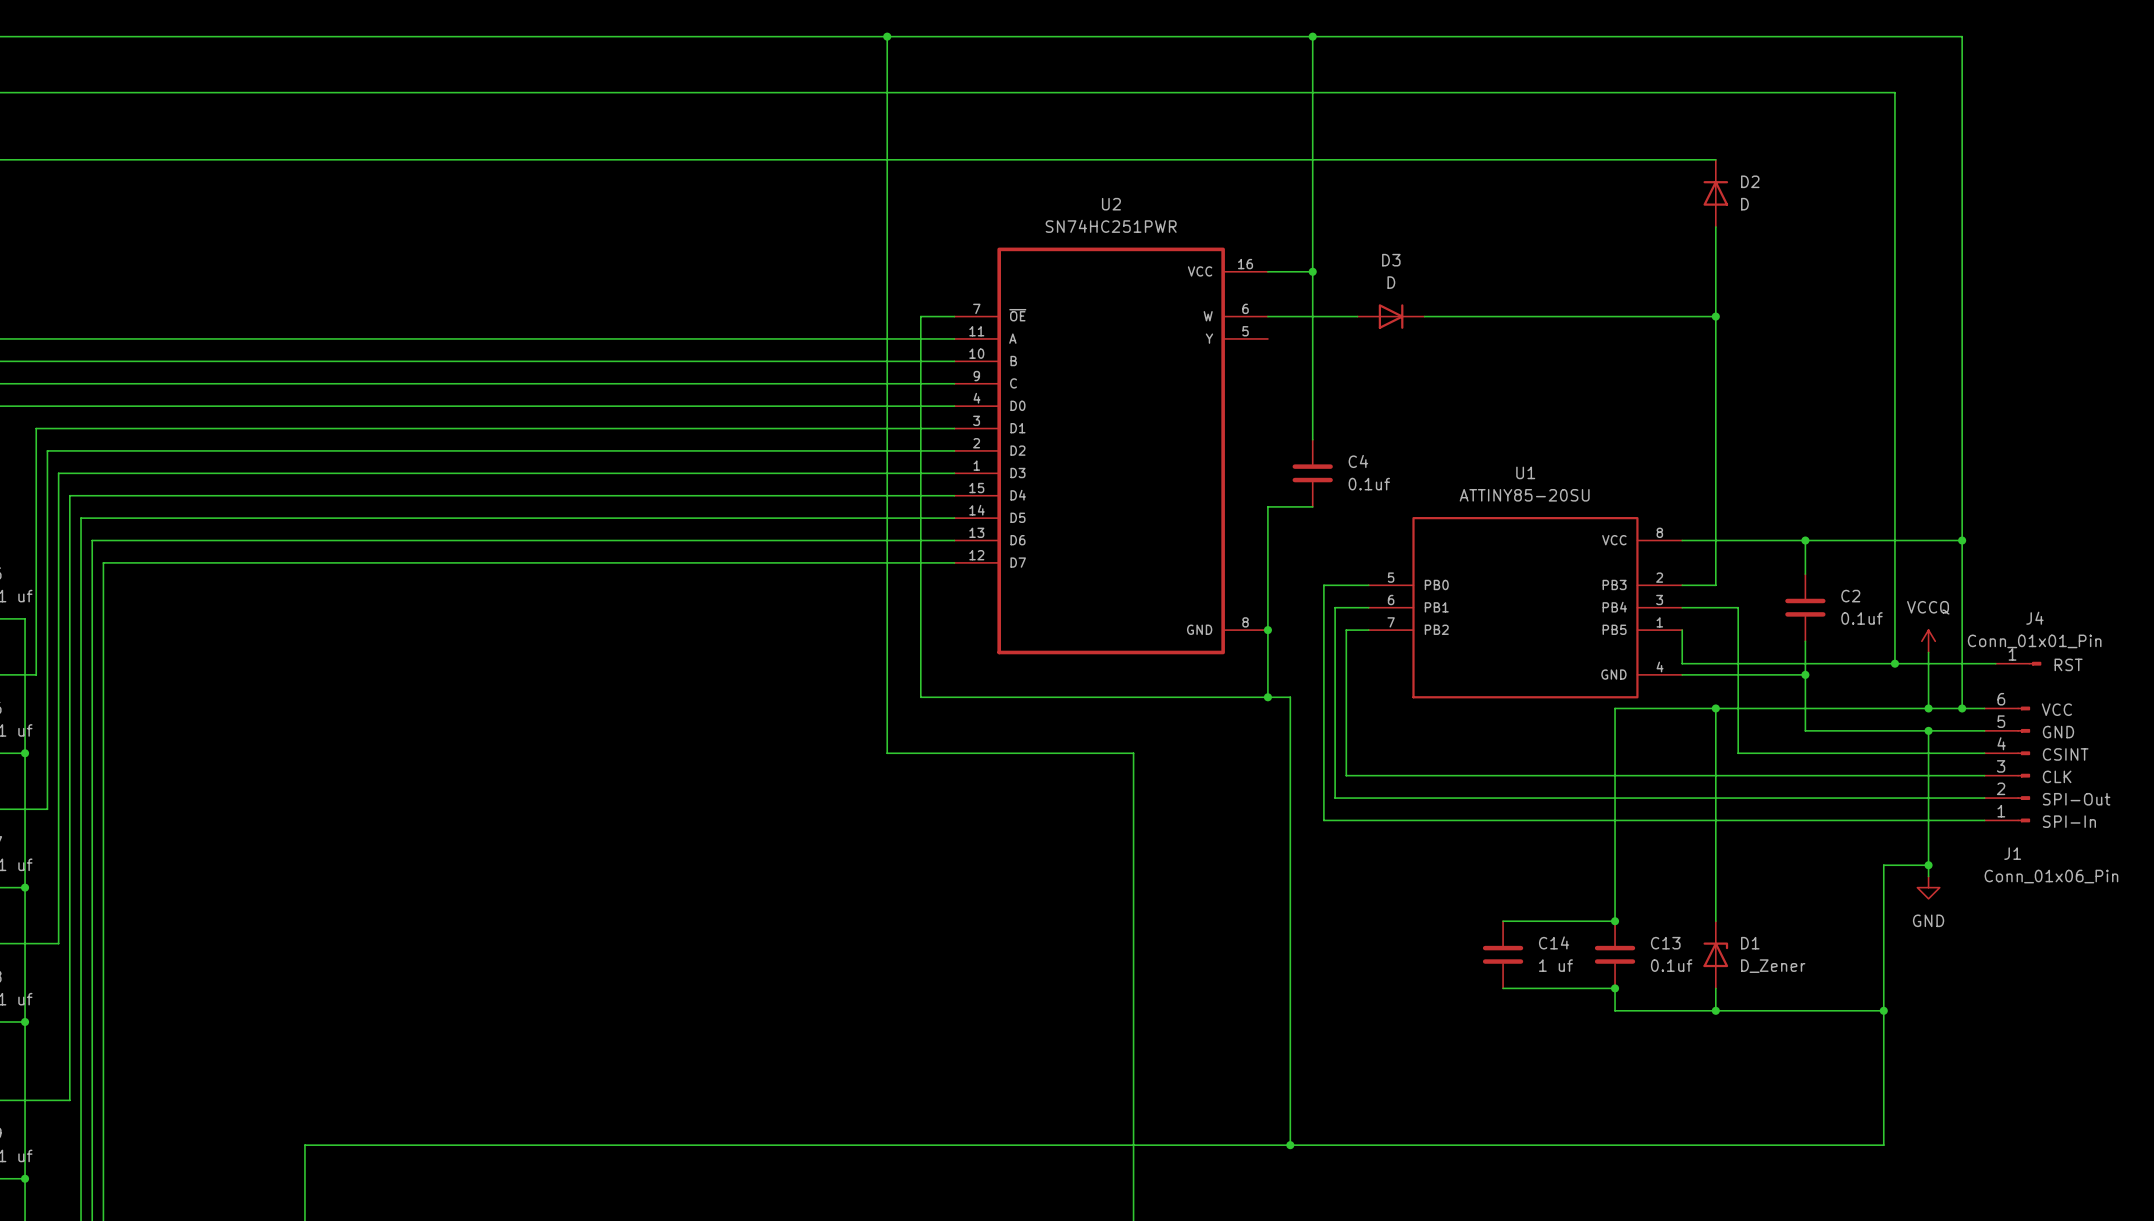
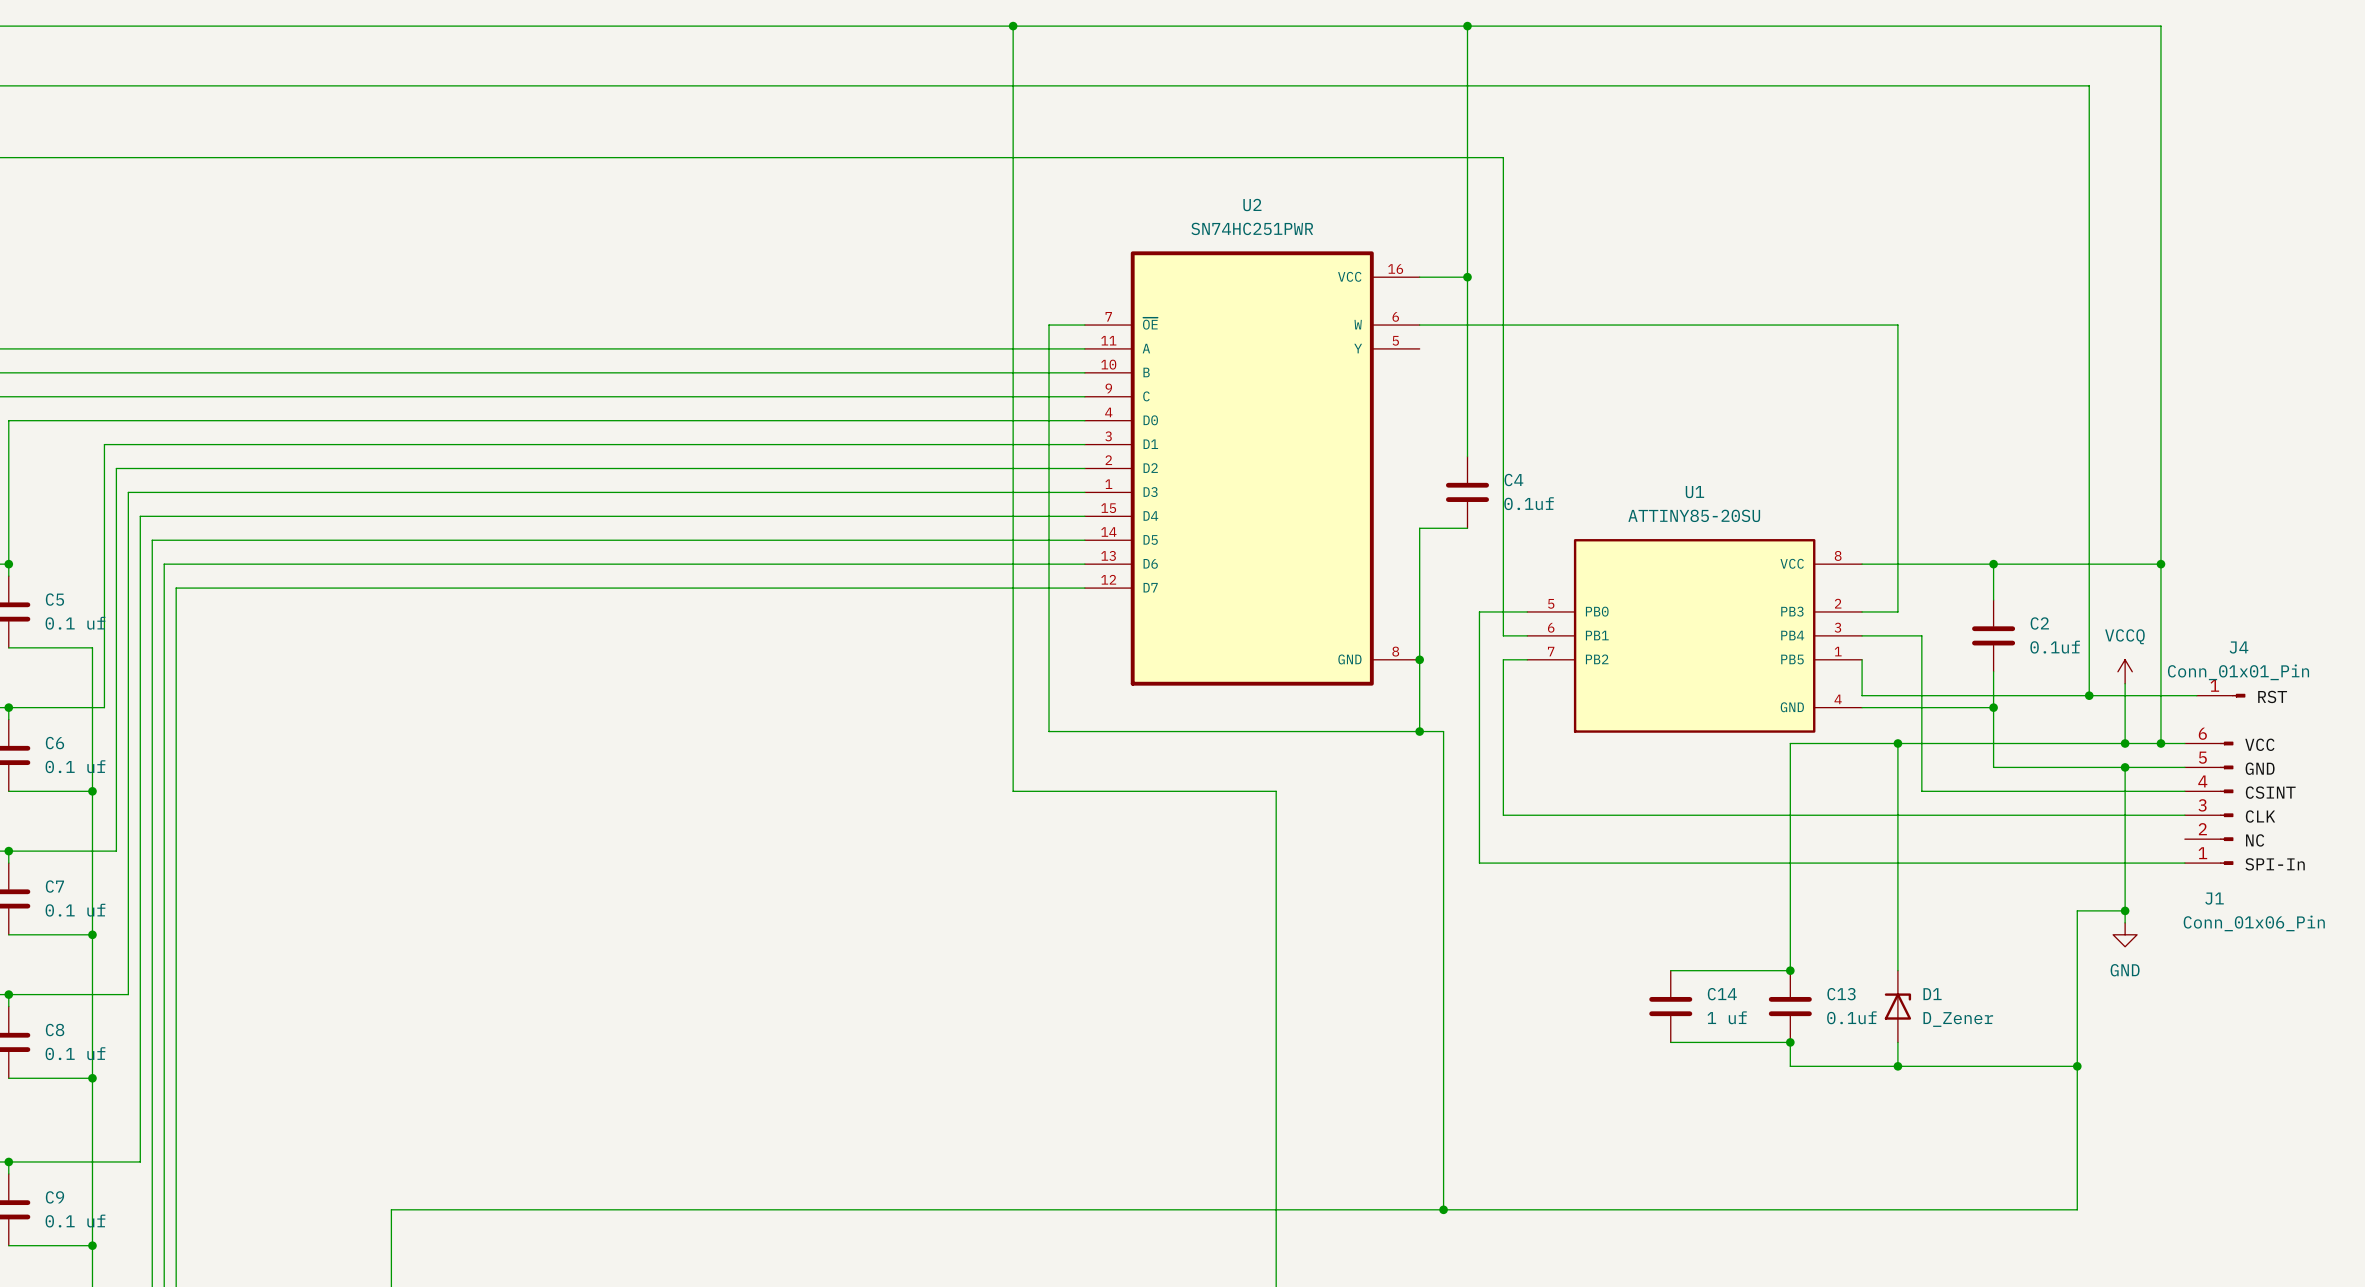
wire: (1346, 159) (1715, 159) -> (1503, 157) (1503, 635)
D2: D (1715, 193) -> none
wire: (1715, 226) (1715, 316) -> none
D3: D (1391, 316) -> none
junction: (1715, 316) -> none
wire: (1346, 607) (1335, 607) (1335, 798) (1984, 798) -> none
label: SPI-Out (2076, 799) -> NC (2255, 840)

